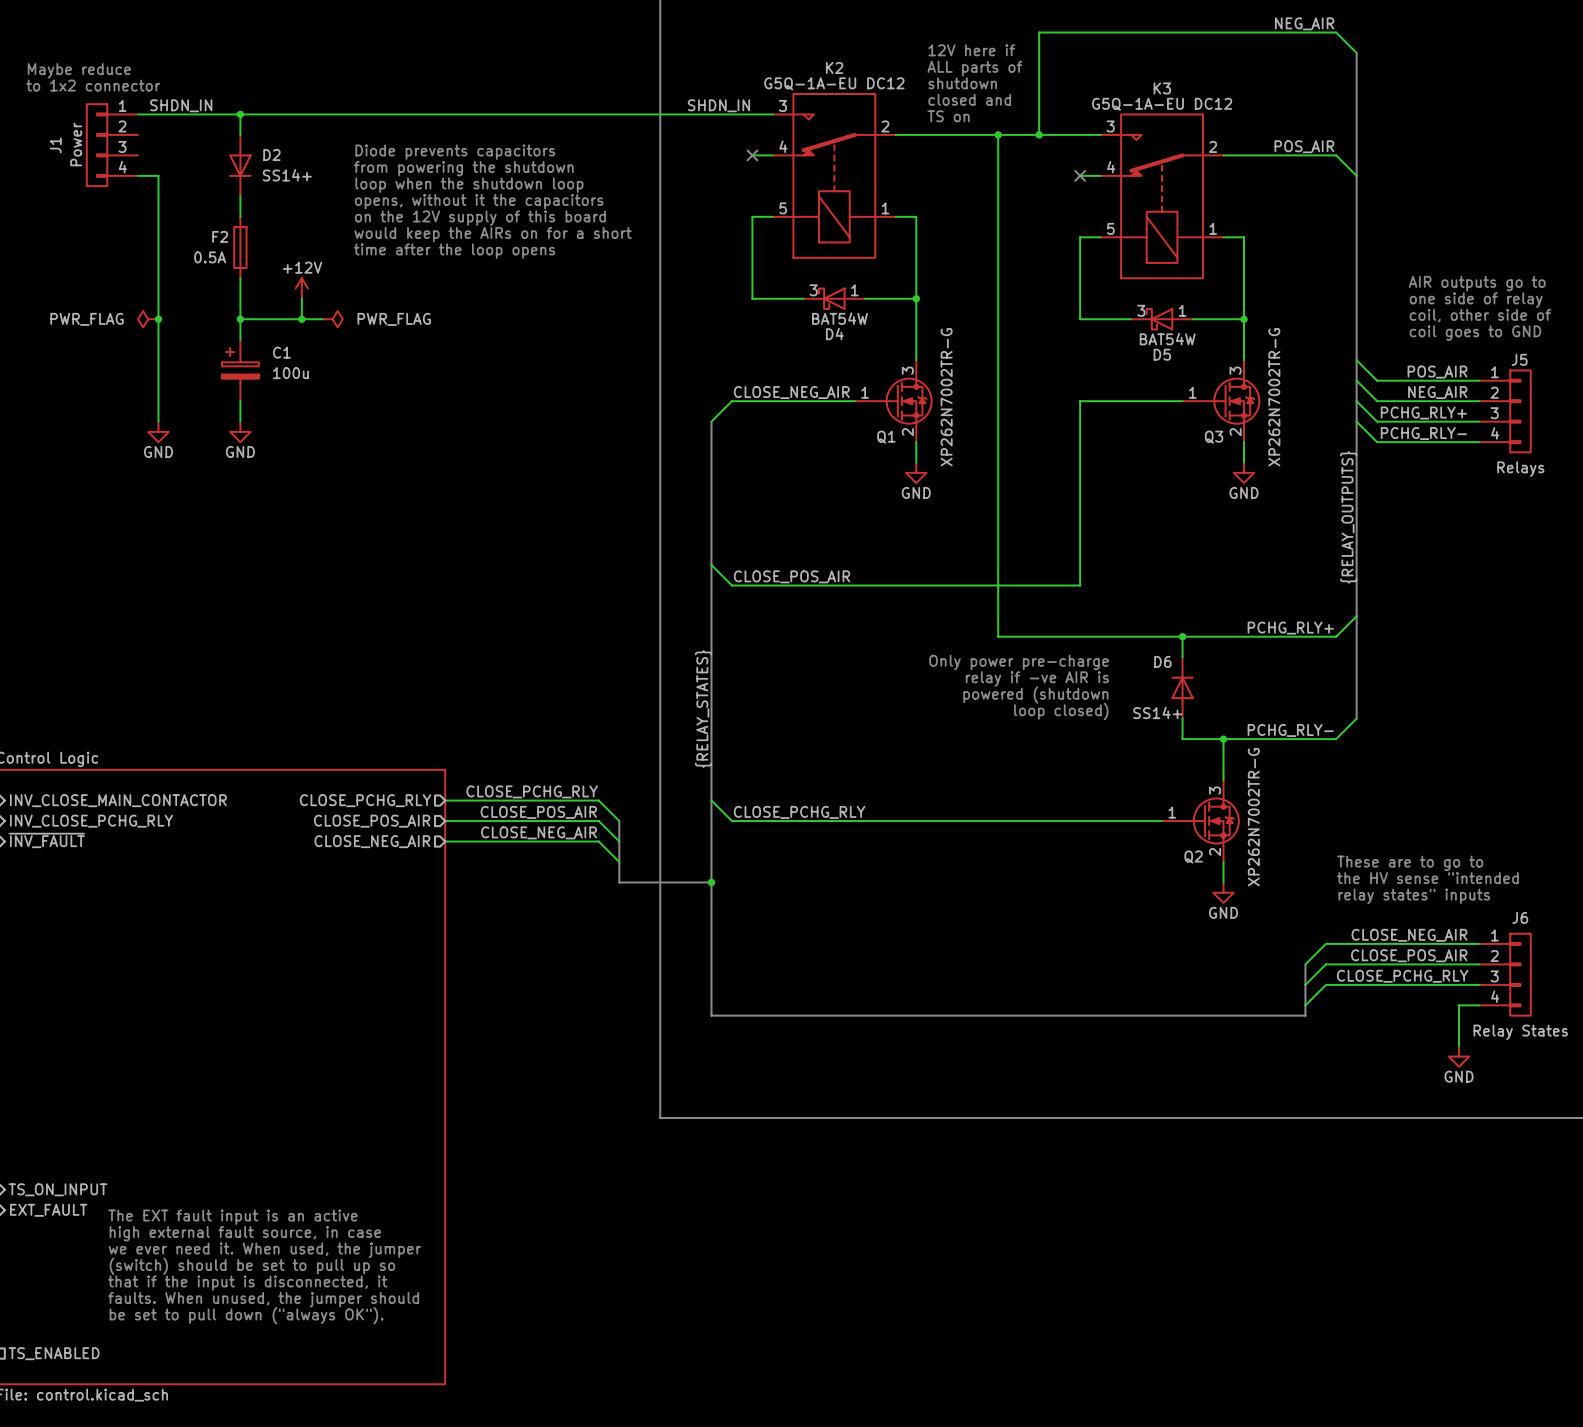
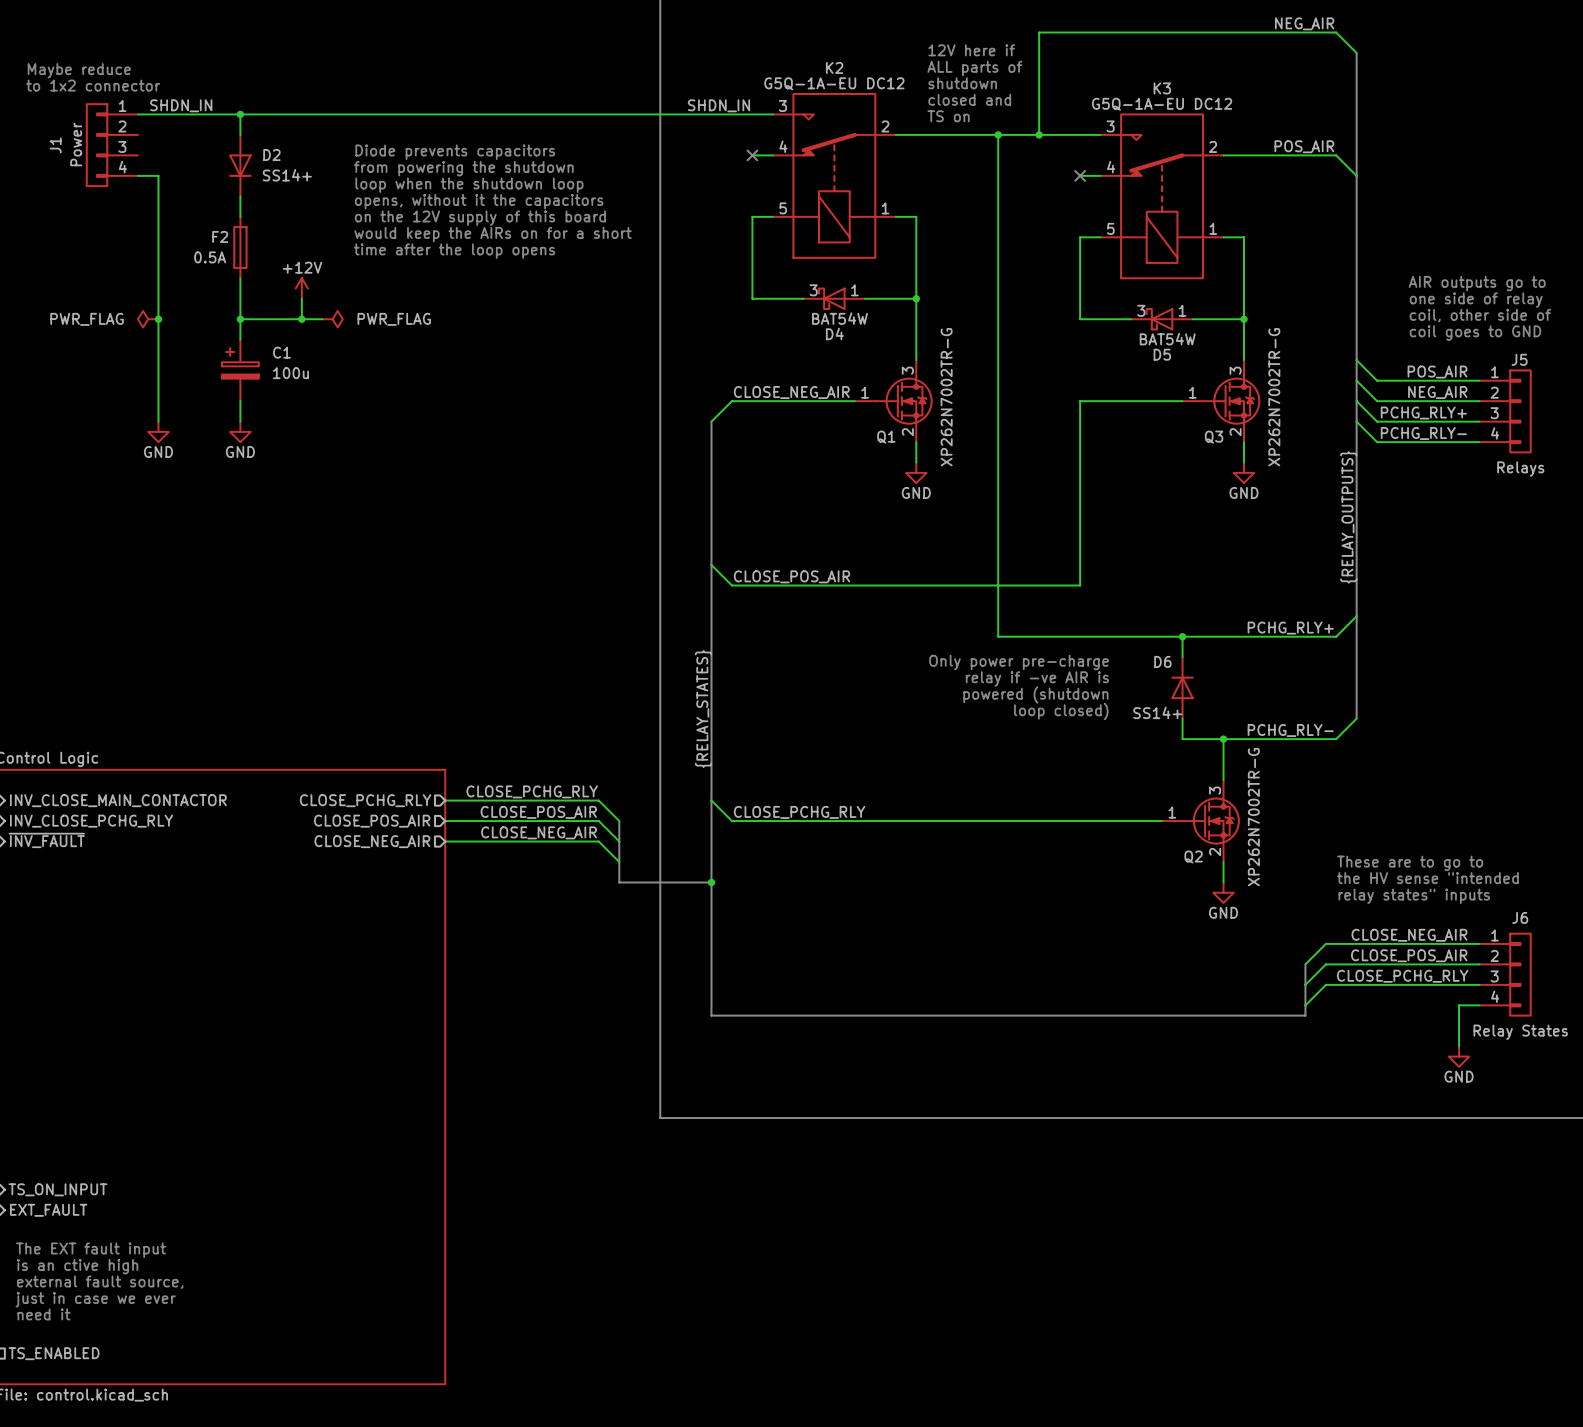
text: The EXT fault input is an active (232, 1217) -> none
text: high external fault source, in case (245, 1233) -> none
text: none -> The EXT fault input (91, 1250)
text: we ever need it. When used, the jumper (264, 1250) -> none
text: none -> is an ctive high (77, 1266)
text: (switch) should be set to pull up so (252, 1266) -> none
text: none -> external fault source, (100, 1282)
text: that if the input is disconnected, it (247, 1283) -> none
text: none -> just in case we ever (95, 1299)
text: faults. When unused, the jumper should (263, 1299) -> none
text: none -> need it (43, 1314)
text: be set to pull down ("always OK"). (246, 1315) -> none

